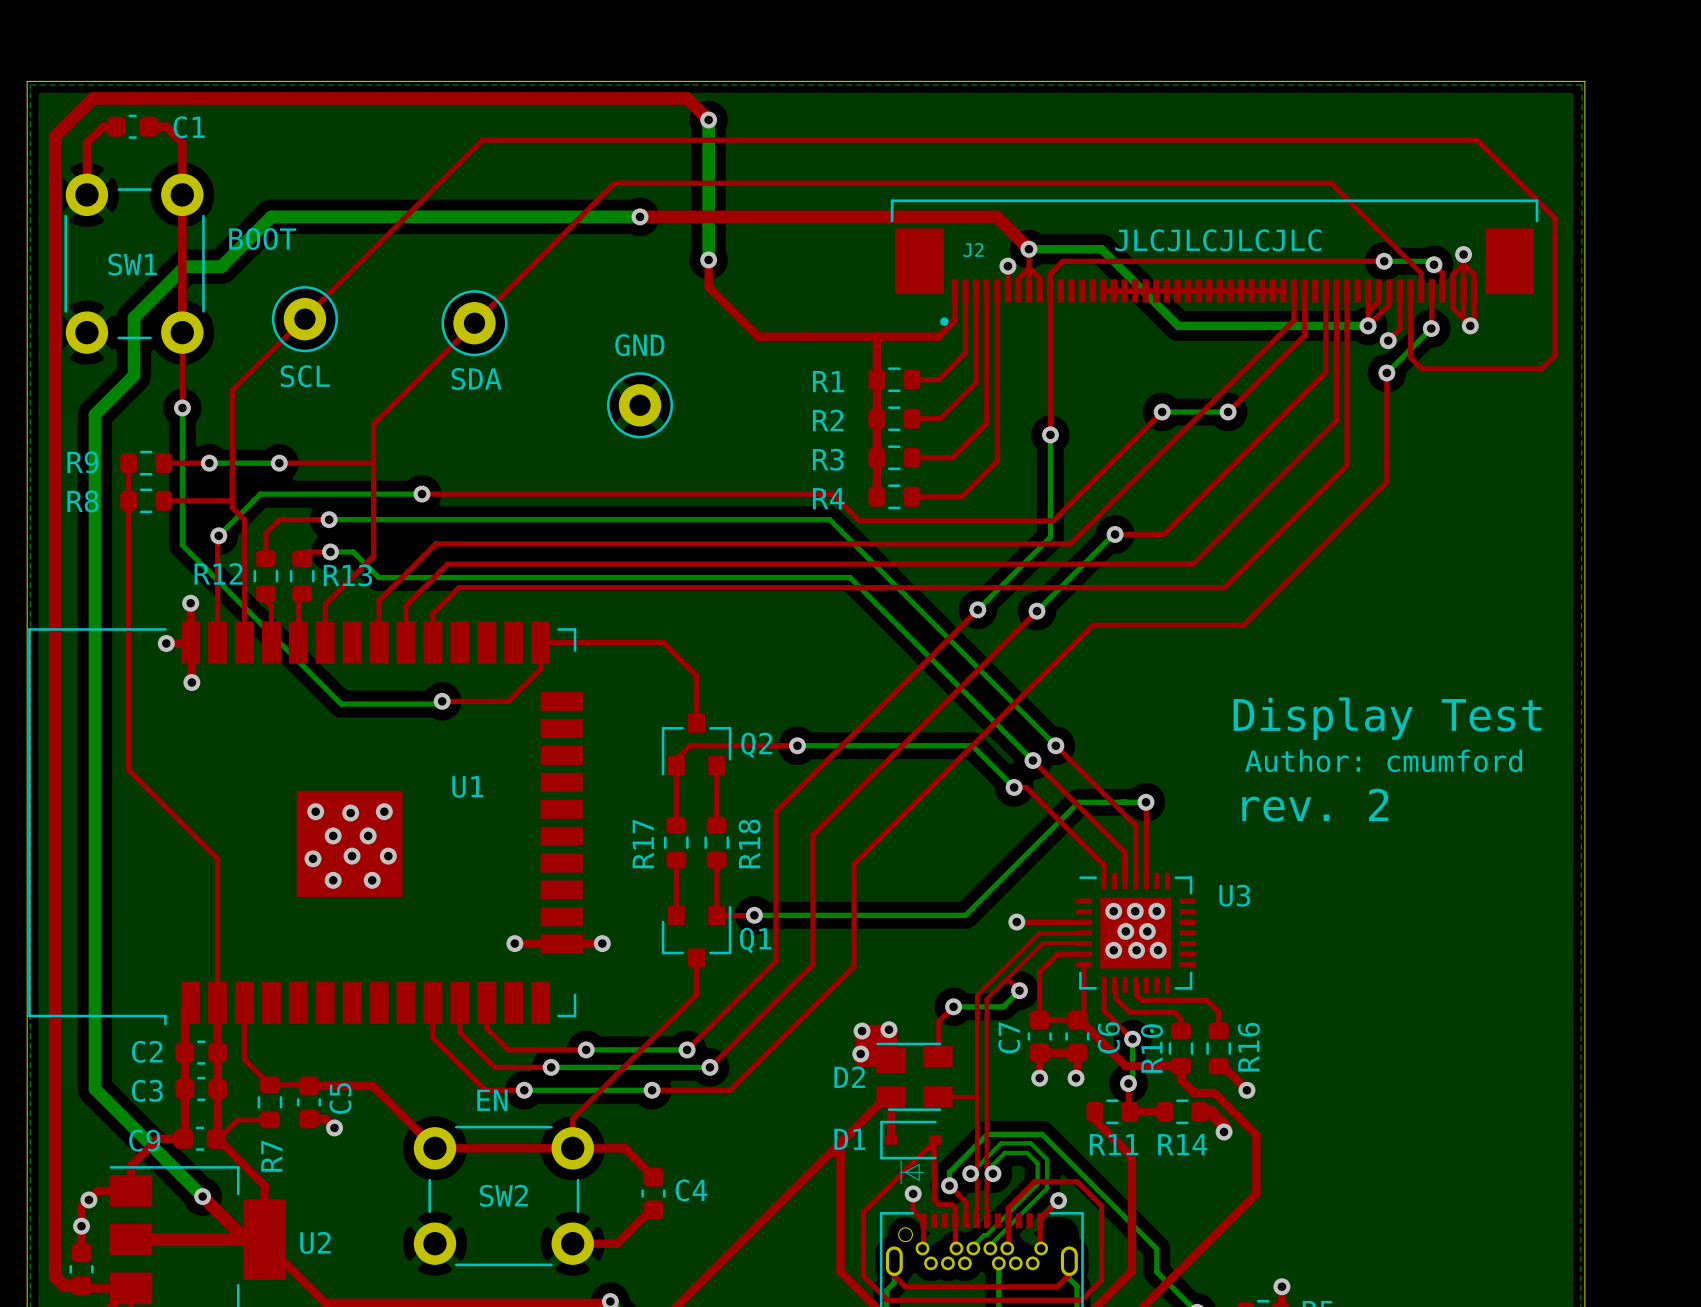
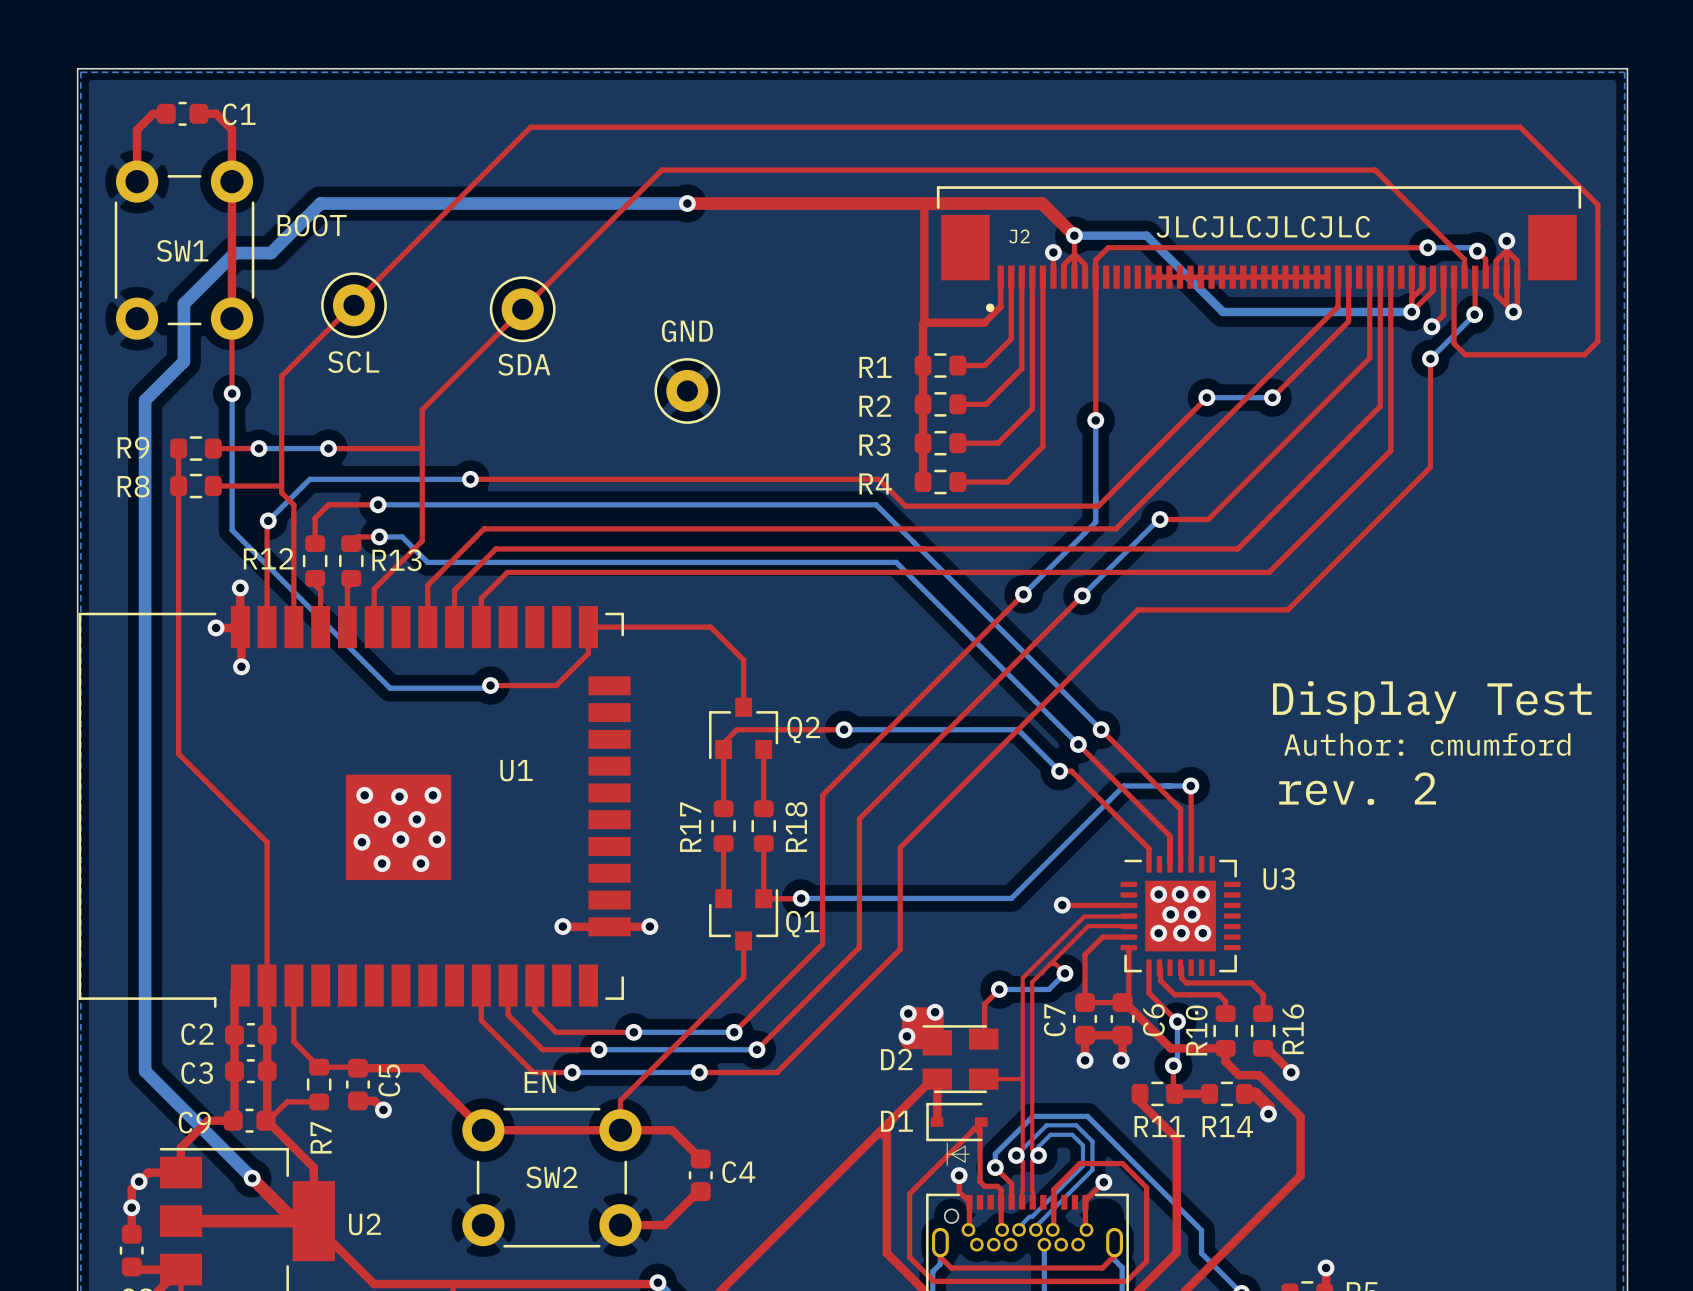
top track: (708, 119) (687, 98) (93, 98) (55, 136) (55, 1276) (64, 1285) (81, 1285) -> none
bottom track: (708, 119) (708, 259) -> none
via: (708, 119) -> none
top track: (708, 259) (708, 286) (758, 336) (878, 336) -> (924, 203) (924, 322)
via: (708, 259) -> none

